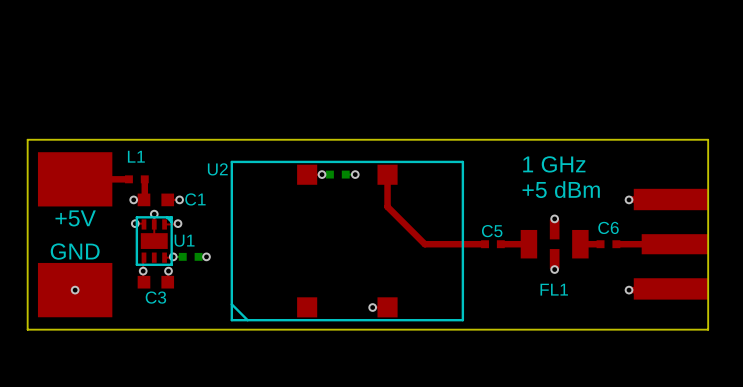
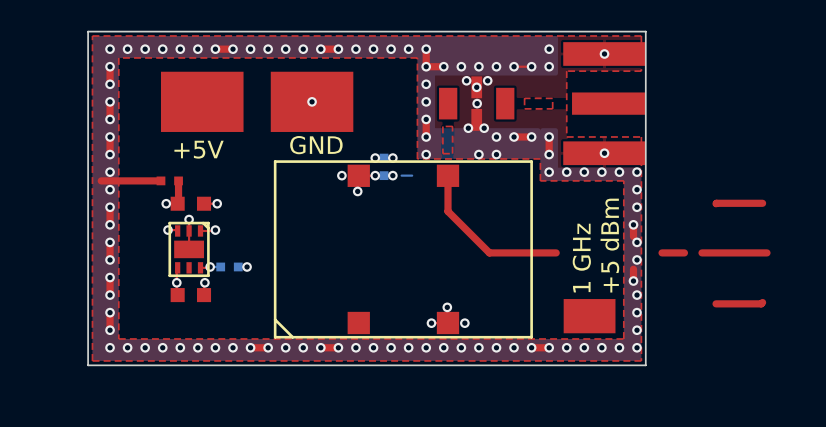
top zone outline: none -> (92, 35) (92, 360) (641, 360) (641, 136) (566, 136) (566, 71) (641, 71) (641, 35) (92, 35)
via: none -> (110, 49)
via: none -> (127, 49)
via: none -> (145, 49)
via: none -> (162, 49)
via: none -> (180, 49)
via: none -> (197, 49)
top track: none -> (215, 49) (233, 49)
via: none -> (215, 49)
via: none -> (233, 49)
via: none -> (250, 49)
via: none -> (268, 49)
via: none -> (285, 49)
via: none -> (303, 49)
top track: none -> (320, 49) (338, 49)
via: none -> (320, 49)
via: none -> (338, 49)
via: none -> (355, 49)
via: none -> (373, 49)
via: none -> (391, 49)
via: none -> (408, 49)
top track: none -> (426, 49) (426, 66) (443, 66)
via: none -> (426, 49)
via: none -> (549, 49)
via: none -> (604, 53)
top zone outline: none -> (118, 57) (118, 338) (623, 338) (623, 180) (540, 180) (540, 158) (417, 158) (417, 57) (118, 57)
top track: none -> (110, 66) (110, 84)
via: none -> (110, 66)
via: none -> (426, 66)
via: none -> (443, 66)
via: none -> (461, 66)
via: none -> (478, 66)
via: none -> (496, 66)
top track: none -> (514, 66) (531, 66)
via: none -> (514, 66)
via: none -> (531, 66)
via: none -> (549, 66)
via: none -> (466, 80)
via: none -> (487, 80)
via: none -> (110, 84)
via: none -> (426, 84)
via: none -> (476, 87)
top zone outline: none -> (524, 98) (524, 108) (552, 108) (552, 98) (524, 98)
top track: none -> (110, 101) (110, 119)
via: none -> (110, 101)
part: none -> (202, 101)
part: none -> (312, 101)
via: none -> (312, 101)
via: none -> (426, 101)
part: none -> (476, 103)
via: none -> (477, 103)
via: none -> (110, 119)
top track: none -> (426, 119) (426, 136)
via: none -> (426, 119)
top zone outline: none -> (442, 126) (442, 153) (452, 153) (452, 126) (442, 126)
via: none -> (468, 128)
via: none -> (484, 128)
board edge: (27, 139) (708, 139) (708, 329) (27, 329) (27, 139) -> (88, 31) (88, 365) (645, 365) (645, 31) (88, 31)
top track: none -> (110, 136) (110, 154)
via: none -> (110, 136)
via: none -> (426, 136)
via: none -> (496, 136)
top track: none -> (514, 136) (531, 136)
via: none -> (514, 136)
via: none -> (531, 136)
top track: none -> (549, 136) (549, 154)
via: none -> (549, 136)
via: none -> (604, 153)
via: none -> (110, 154)
via: none -> (426, 154)
via: none -> (478, 154)
via: none -> (496, 154)
via: none -> (549, 154)
L1 name: L1 (136, 156) -> none
via: none -> (375, 158)
via: none -> (392, 158)
text rotation: 0° (554, 164) -> 90° counterclockwise (581, 258)
text position: 1 GHz (554, 164) -> 1 GHz (581, 258)
U2 name: U2 (217, 169) -> none
via: none -> (110, 172)
via: none -> (549, 172)
via: none -> (566, 172)
via: none -> (584, 172)
via: none -> (601, 172)
via: none -> (619, 172)
via: none -> (637, 172)
via: none -> (341, 175)
part rotation: 0° (337, 174) -> 90° clockwise (384, 166)
via: none -> (392, 175)
via: (355, 174) -> none
part: (75, 179) -> none
via: none -> (110, 189)
via: none -> (637, 189)
via: none -> (357, 191)
text rotation: 0° (561, 189) -> 90° counterclockwise (609, 245)
C1 name: C1 (195, 199) -> none
via: (629, 199) -> none
top track: none -> (110, 207) (110, 224)
via: none -> (110, 207)
via: none -> (637, 207)
text position: +5V (75, 218) -> +5V (199, 149)
via: none -> (110, 224)
top track: none -> (110, 242) (110, 259)
via: none -> (110, 242)
via: none -> (637, 242)
U1 name: U1 (184, 240) -> none
C5: (492, 244) -> none
top track: (500, 244) (528, 244) -> none
FL1: (554, 244) -> none
C6: (608, 244) -> none
part position: (670, 244) -> (604, 103)
via: none -> (110, 259)
via: none -> (637, 259)
text position: GND (75, 251) -> GND (316, 145)
top track: none -> (110, 277) (110, 295)
via: none -> (110, 277)
via: none -> (110, 295)
via: none -> (637, 295)
part: (75, 290) -> none
via: (75, 290) -> none
via: (629, 290) -> none
via: none -> (447, 307)
C3 name: C3 (155, 297) -> none
top track: none -> (110, 312) (110, 330)
via: none -> (110, 312)
via: none -> (637, 312)
part: none -> (589, 316)
via: none -> (464, 323)
via: none -> (110, 330)
via: none -> (637, 330)
via: none -> (110, 347)
via: none -> (127, 347)
via: none -> (145, 347)
via: none -> (162, 347)
via: none -> (180, 347)
via: none -> (197, 347)
via: none -> (215, 347)
via: none -> (233, 347)
top track: none -> (250, 347) (268, 347)
via: none -> (250, 347)
via: none -> (268, 347)
via: none -> (285, 347)
via: none -> (303, 347)
top track: none -> (320, 347) (338, 347)
via: none -> (320, 347)
via: none -> (338, 347)
via: none -> (355, 347)
via: none -> (373, 347)
via: none -> (391, 347)
via: none -> (408, 347)
via: none -> (426, 347)
via: none -> (443, 347)
via: none -> (461, 347)
via: none -> (478, 347)
via: none -> (496, 347)
via: none -> (514, 347)
top track: none -> (531, 347) (549, 347)
via: none -> (531, 347)
via: none -> (549, 347)
via: none -> (566, 347)
via: none -> (584, 347)
via: none -> (601, 347)
via: none -> (619, 347)
via: none -> (637, 347)

